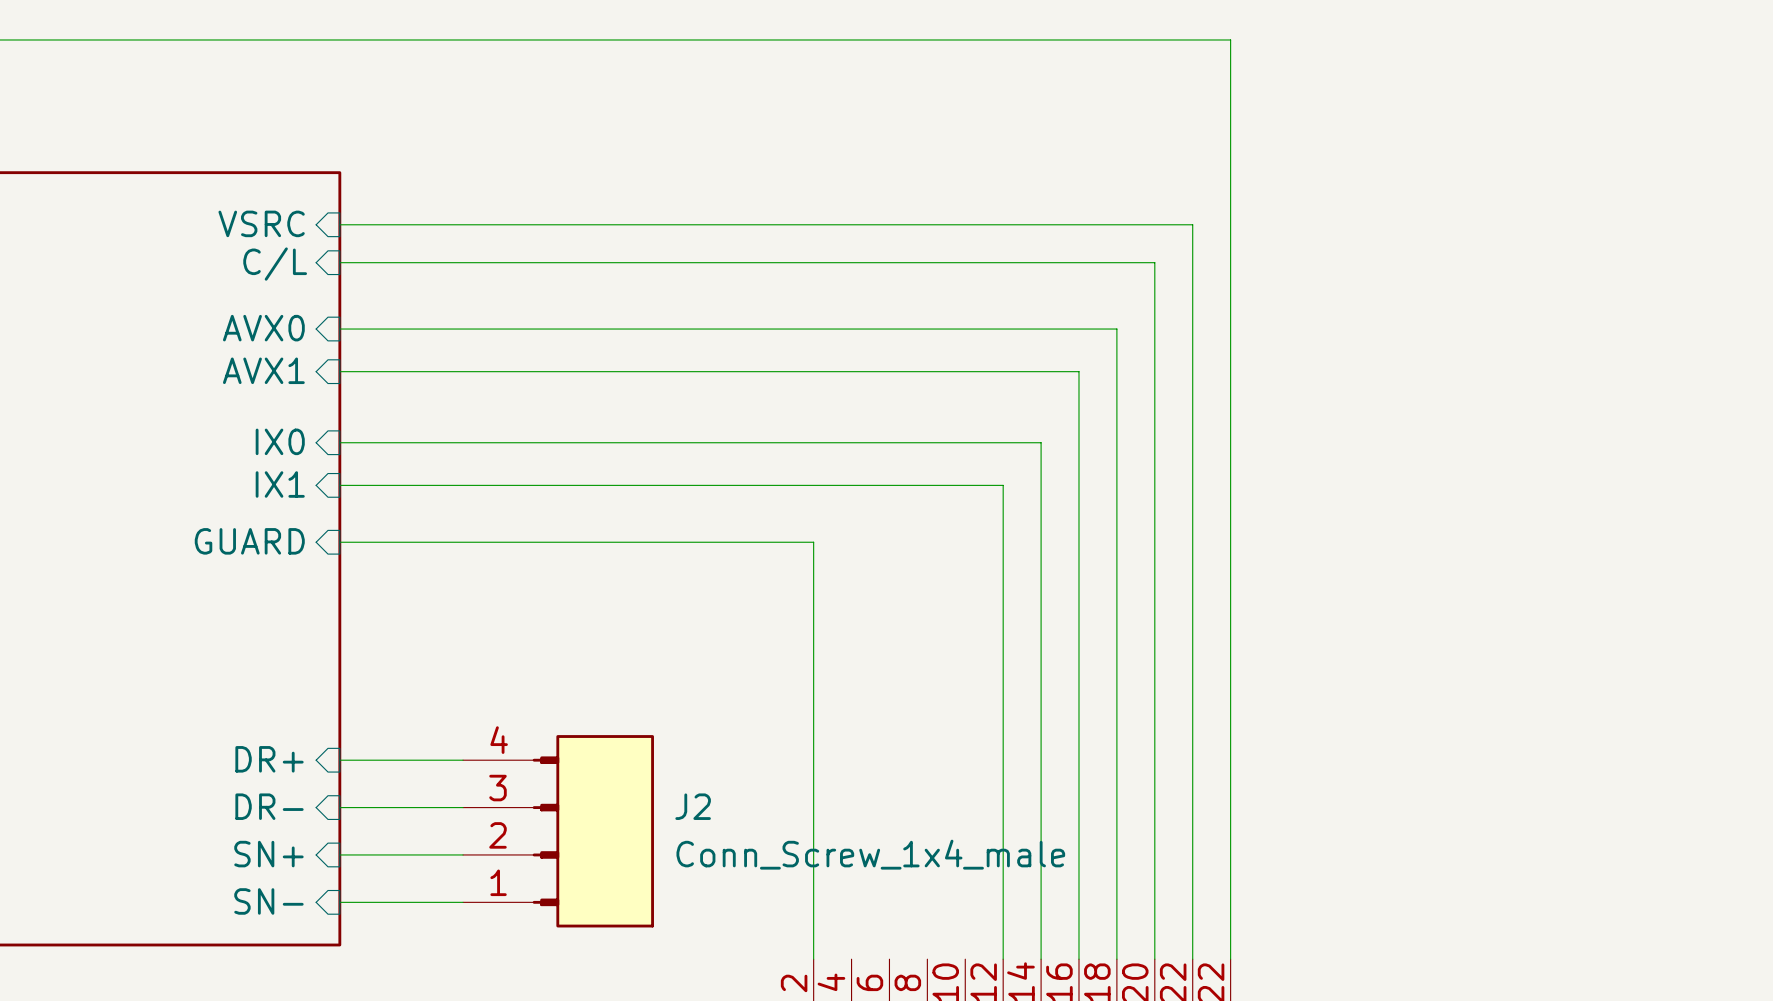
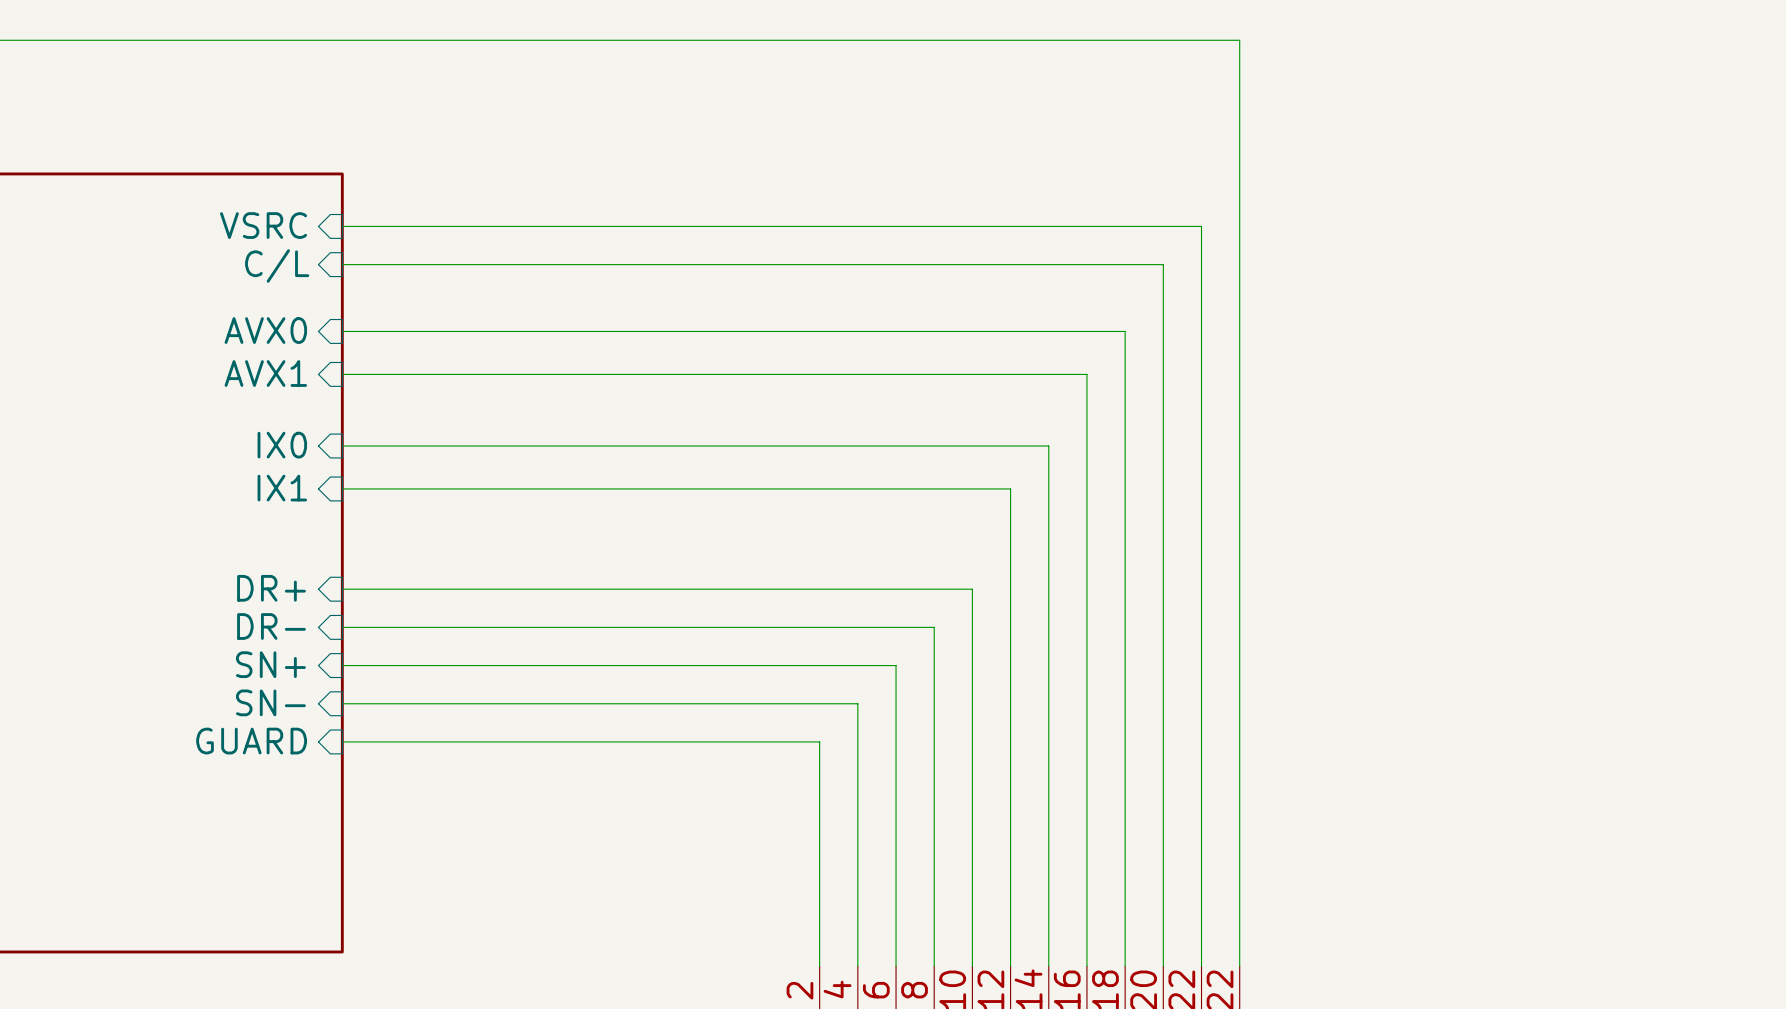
sheet pin position: GUARD (249, 541) -> GUARD (251, 741)
wire: (339, 542) (813, 542) (813, 736) -> (342, 741) (819, 741)
wire: none -> (342, 589) (972, 589) (972, 966)
wire: none -> (342, 627) (934, 627) (934, 966)
wire: none -> (342, 665) (896, 665) (896, 966)
wire: none -> (342, 703) (857, 703) (857, 966)
sheet pin position: DR+ (269, 759) -> DR+ (271, 588)
wire: (339, 760) (463, 760) -> none
sheet pin position: DR- (269, 806) -> DR- (271, 626)
wire: (339, 807) (463, 807) -> none
J2: Conn_Screw_1x4_male (558, 831) -> none
sheet pin position: SN+ (268, 854) -> SN+ (270, 664)
wire: (339, 854) (463, 854) -> none
sheet pin position: SN- (268, 901) -> SN- (270, 702)
wire: (339, 902) (463, 902) -> none

